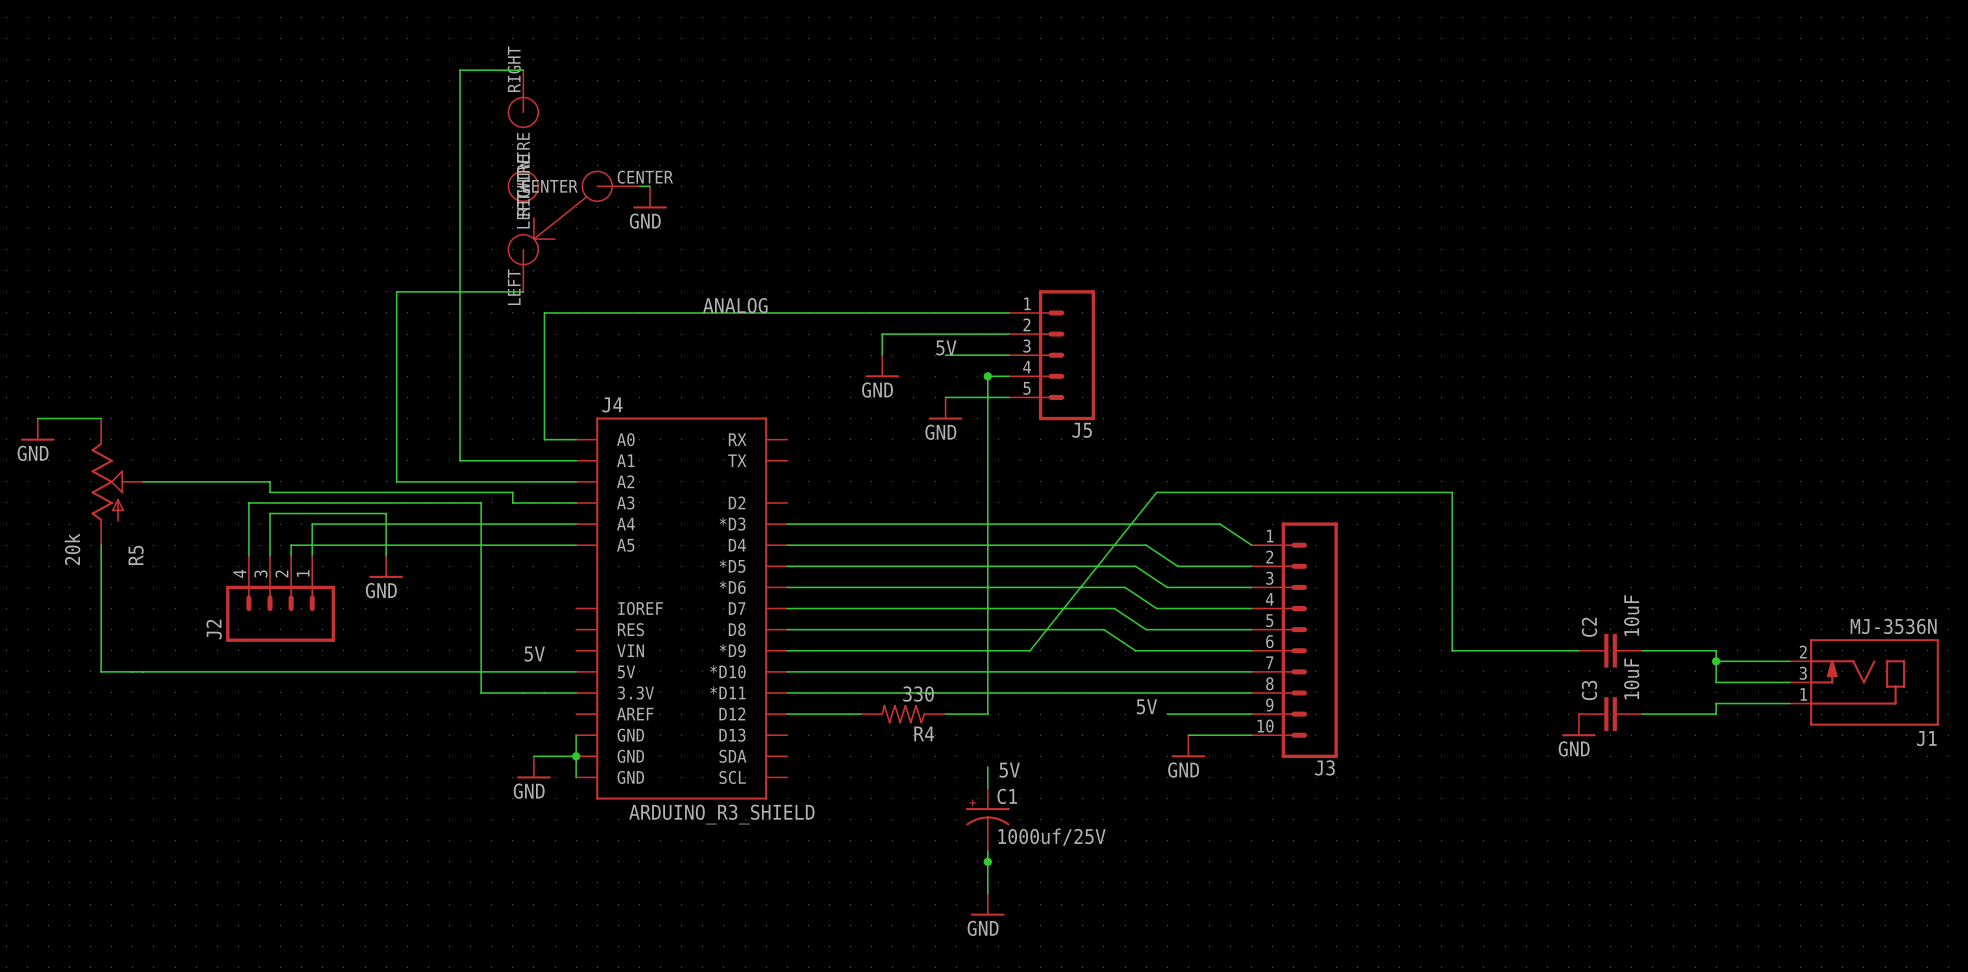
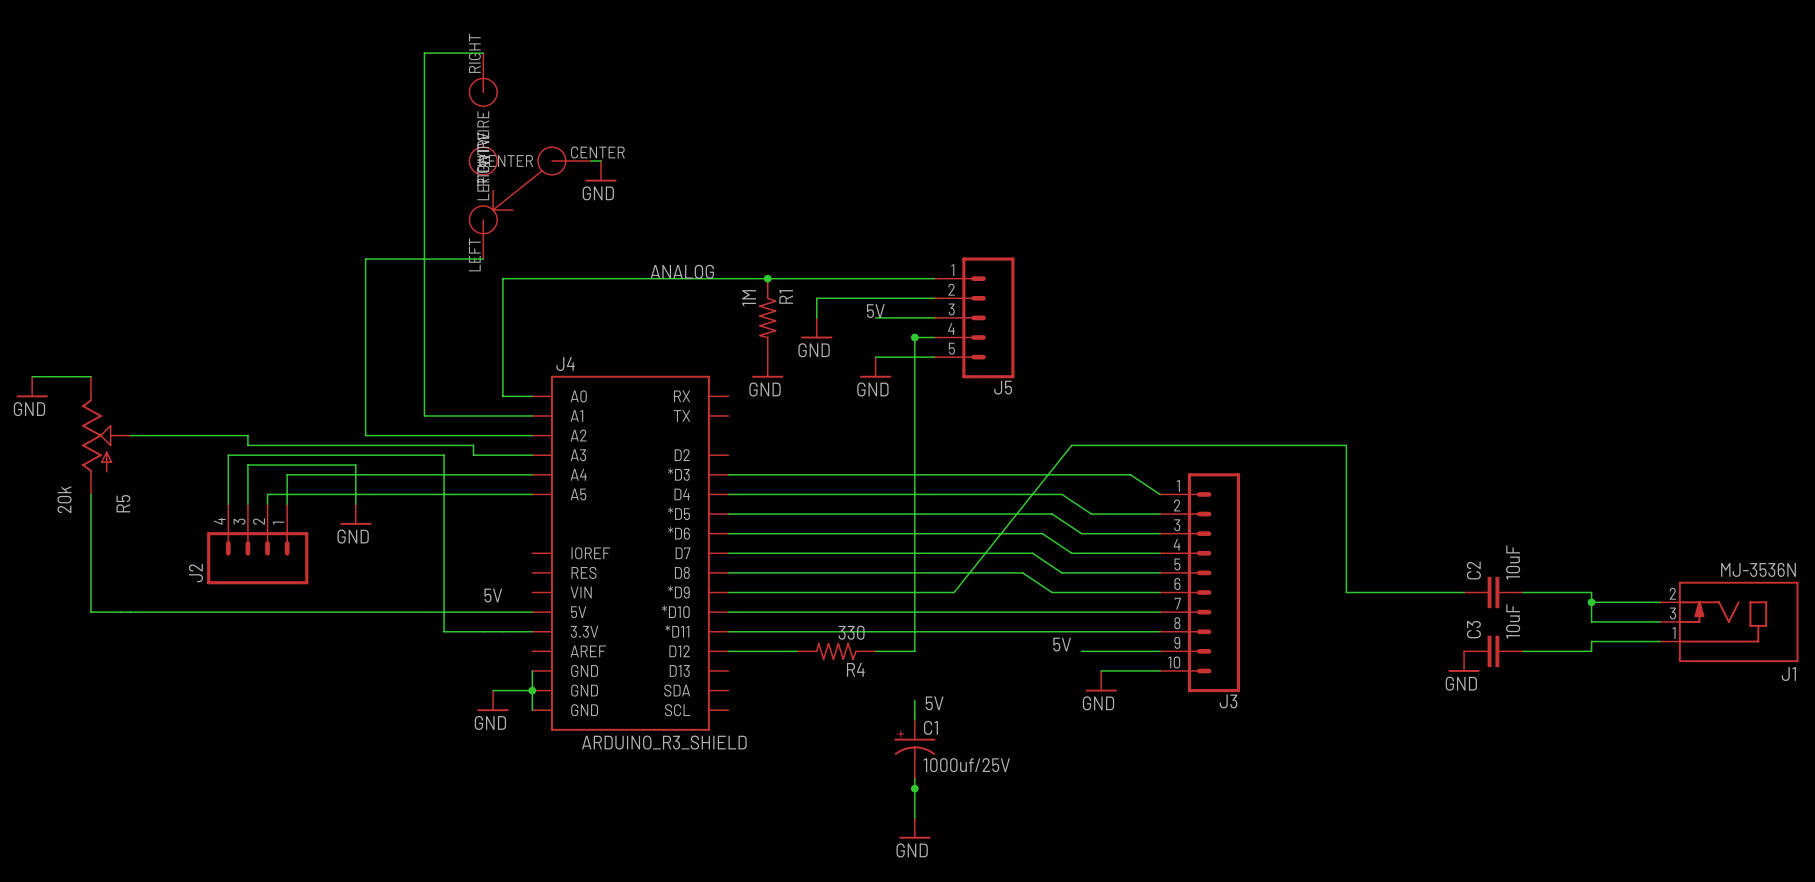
junction: none -> (767, 278)
R1: none -> 1M (767, 317)
power symbol: none -> GND (767, 367)

